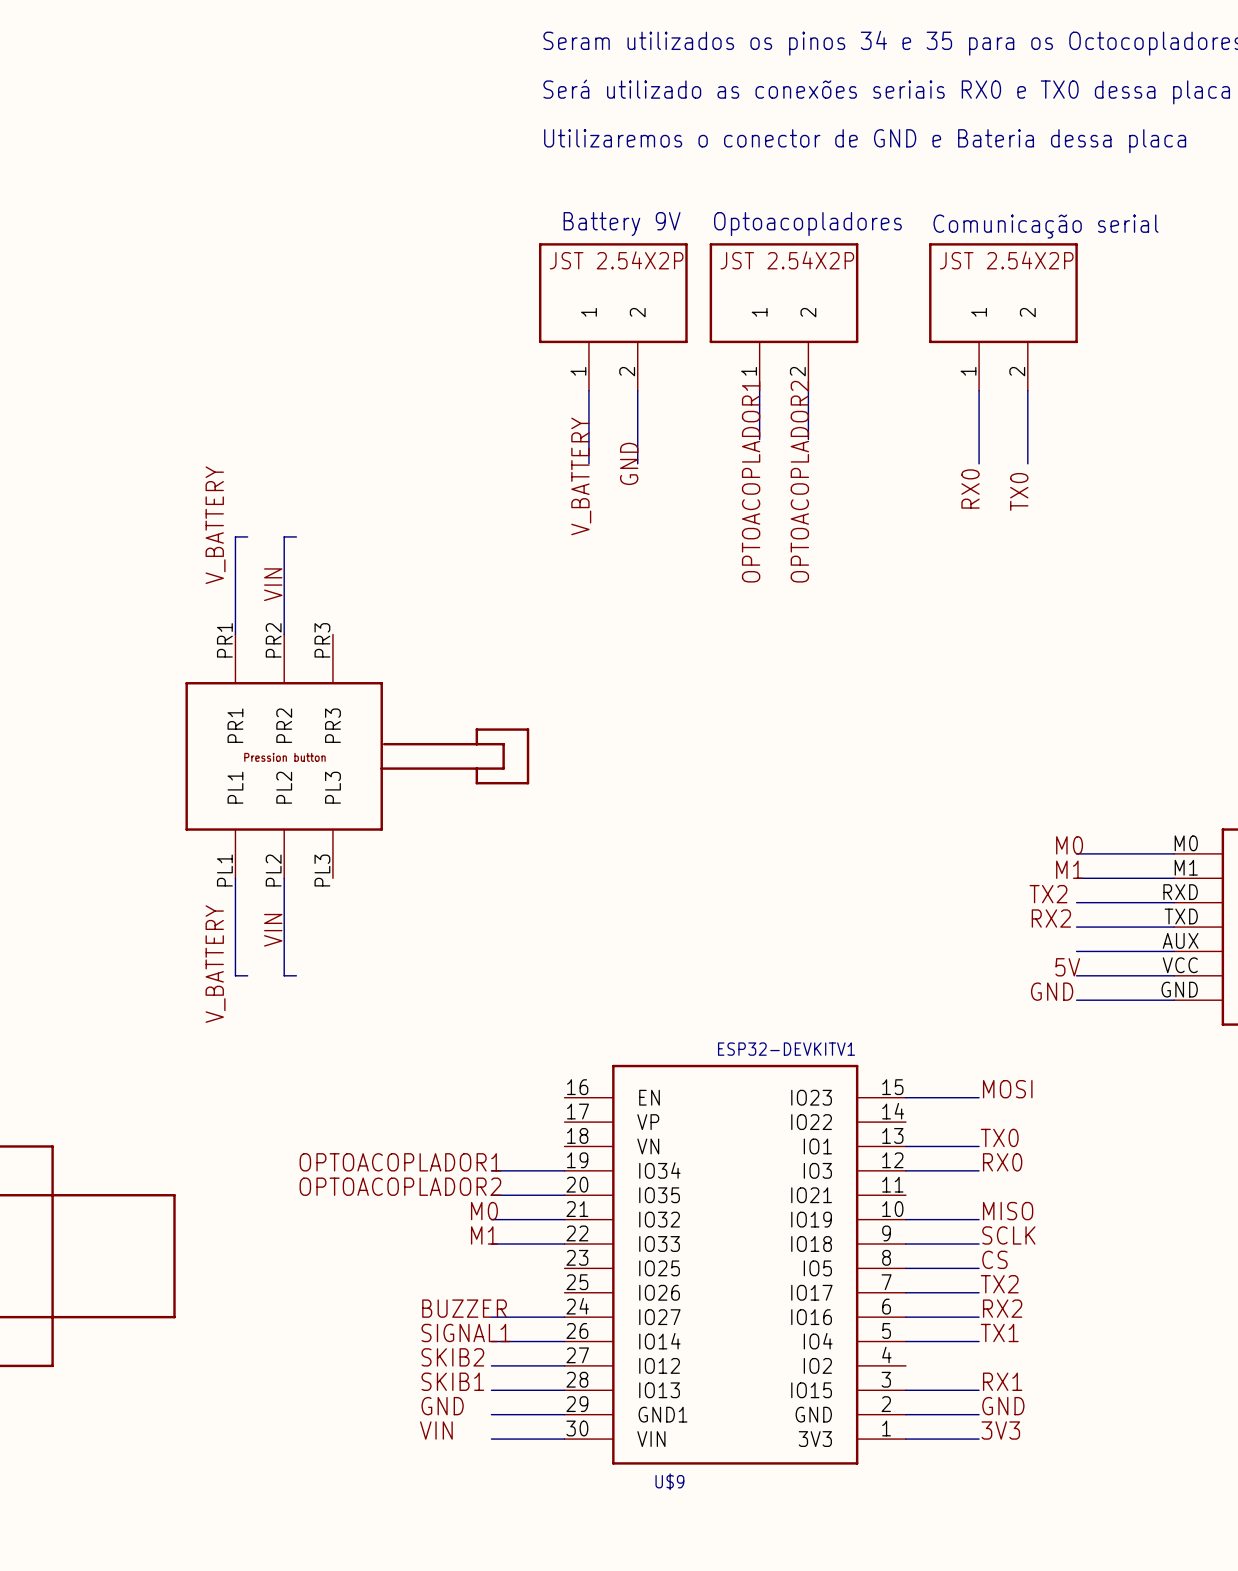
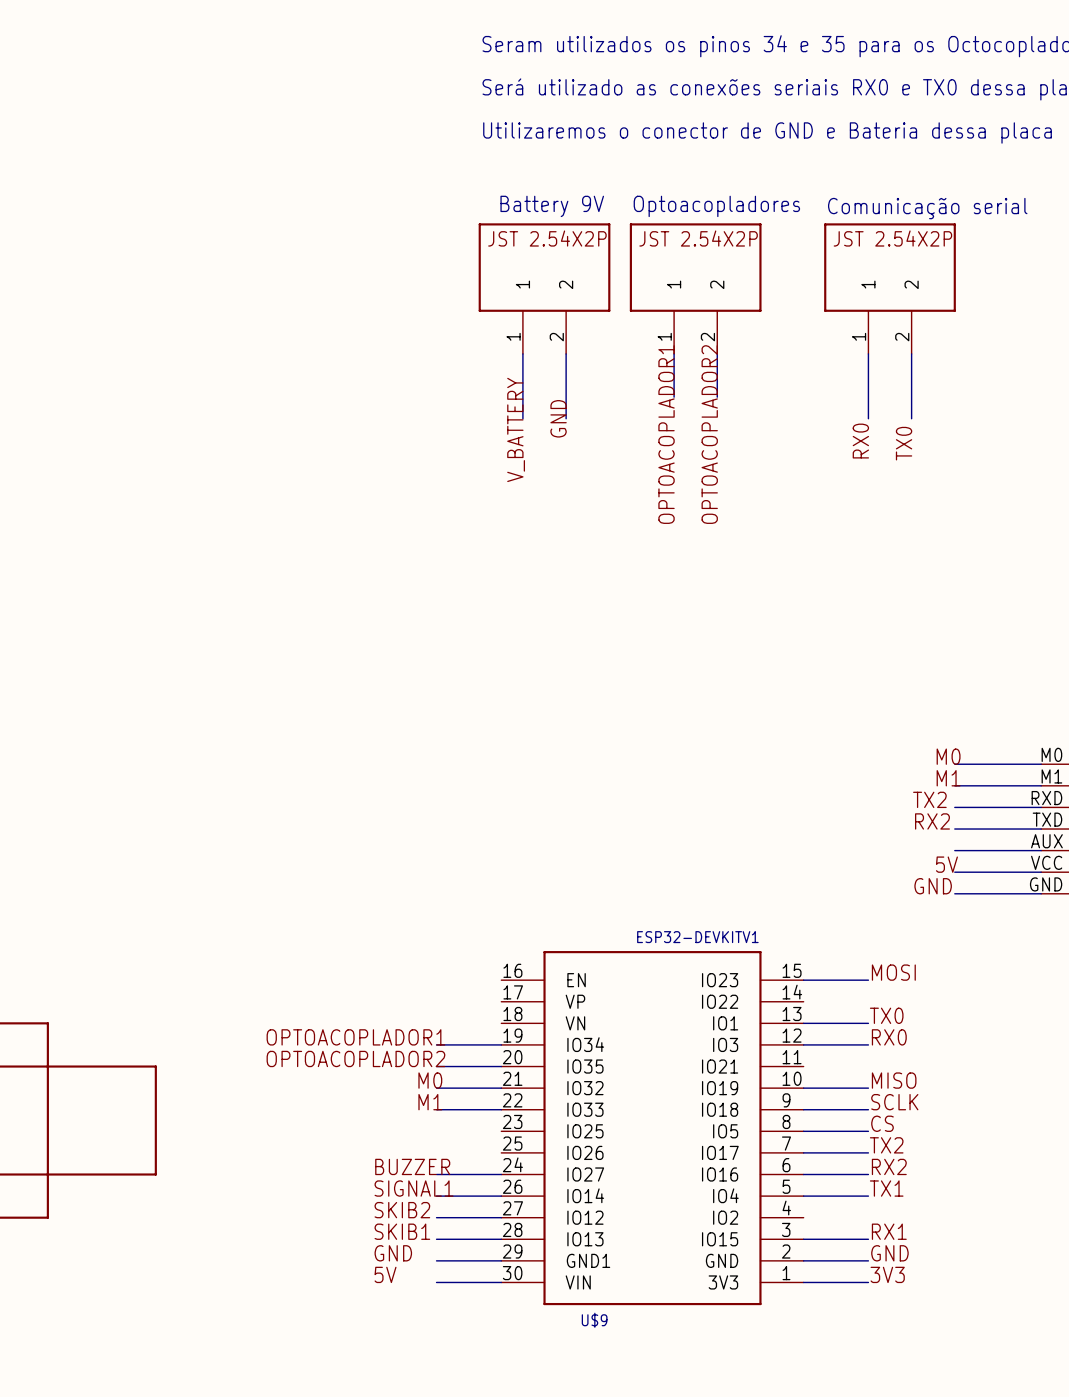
label: V_BATTERY (215, 525) -> none
wire: (247, 536) (235, 536) (235, 634) -> none
wire: (296, 536) (284, 536) (284, 634) -> none
label: VIN (273, 584) -> none
part: (357, 756) -> none
wire: (235, 878) (235, 975) (247, 975) -> none
wire: (284, 878) (284, 975) (296, 975) -> none
label: VIN (273, 930) -> none
label: V_BATTERY (215, 964) -> none
label: VIN (436, 1430) -> 5V (385, 1274)

